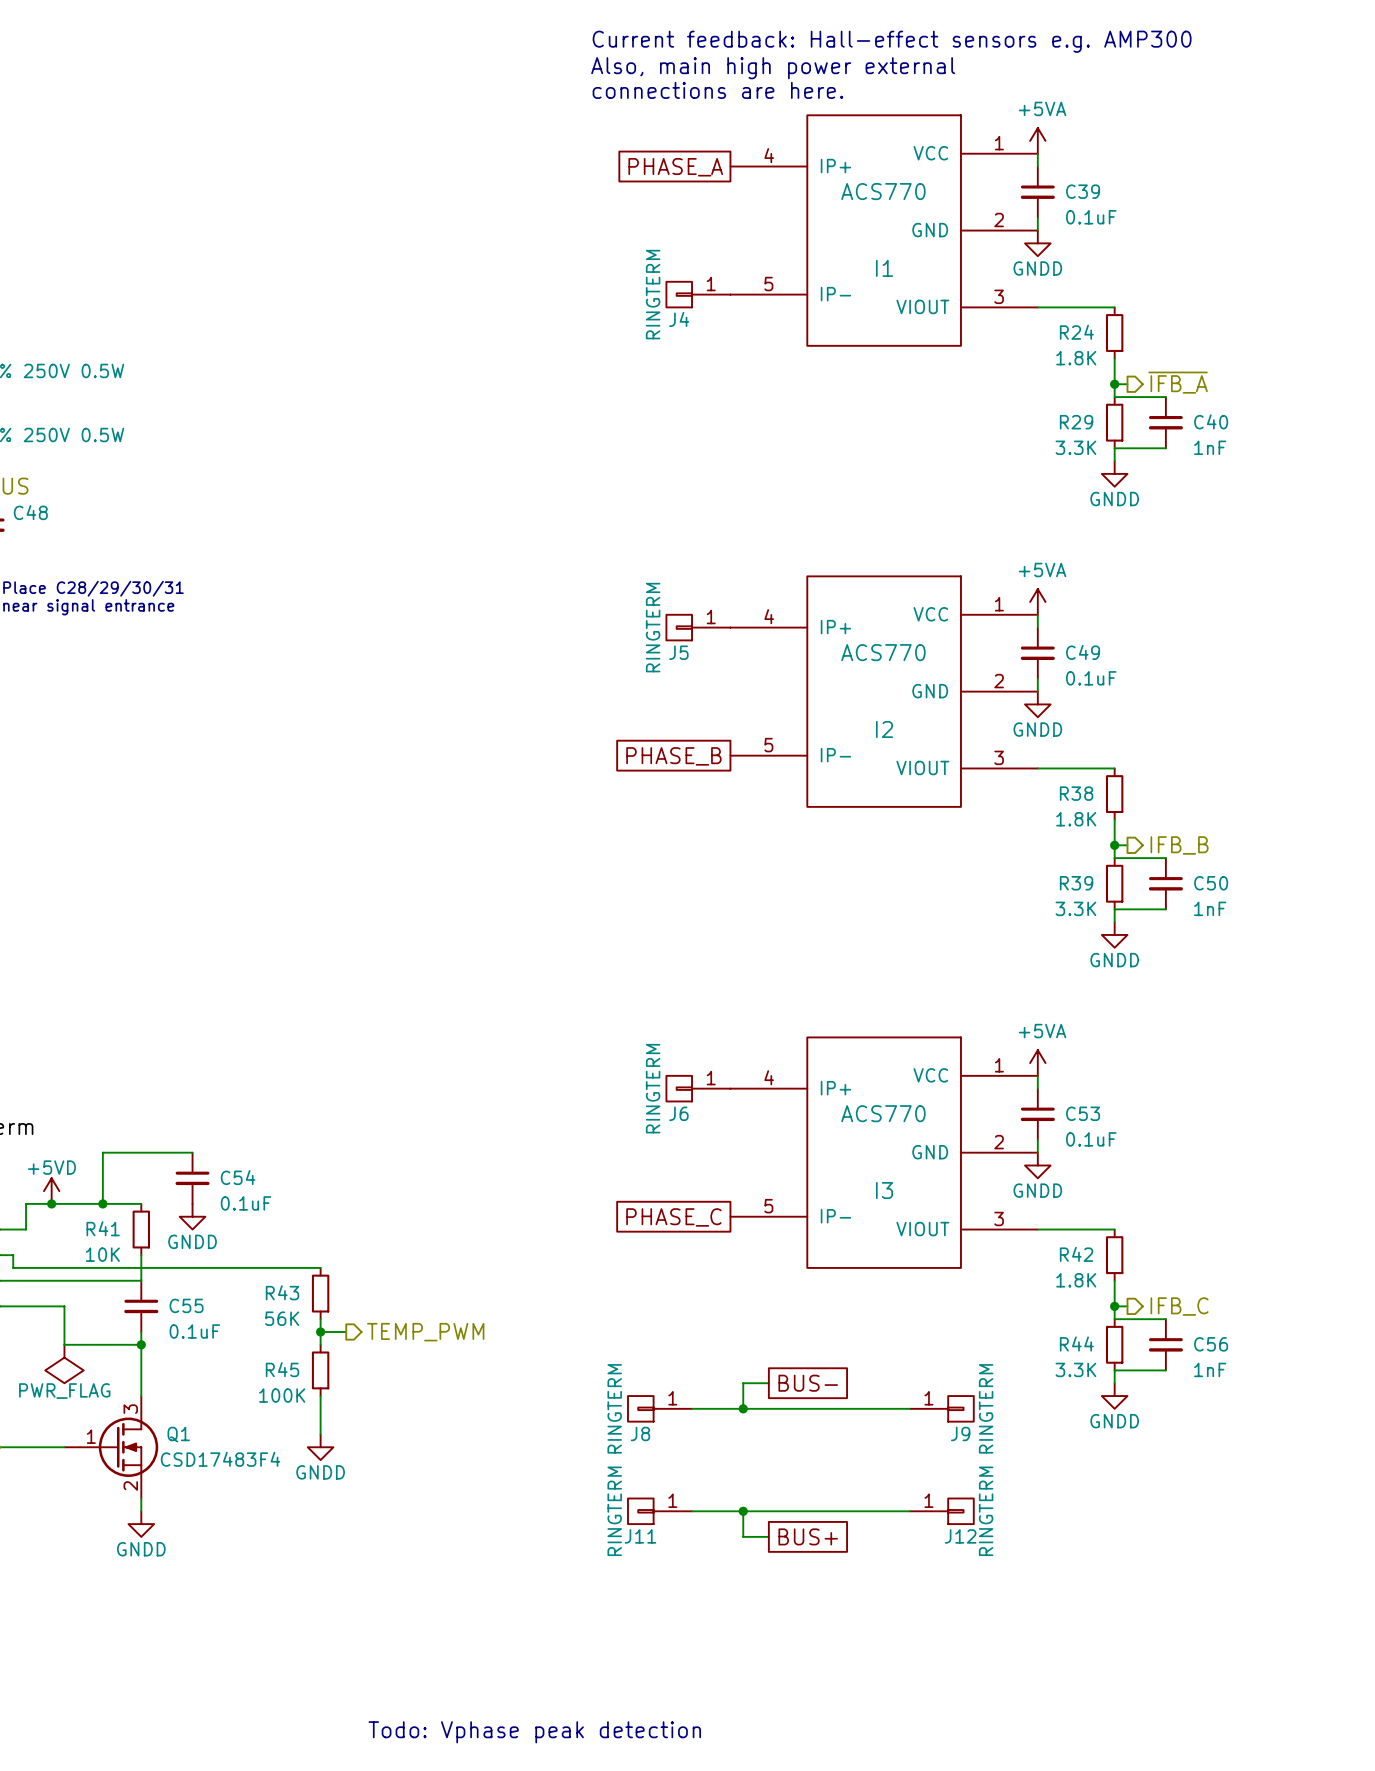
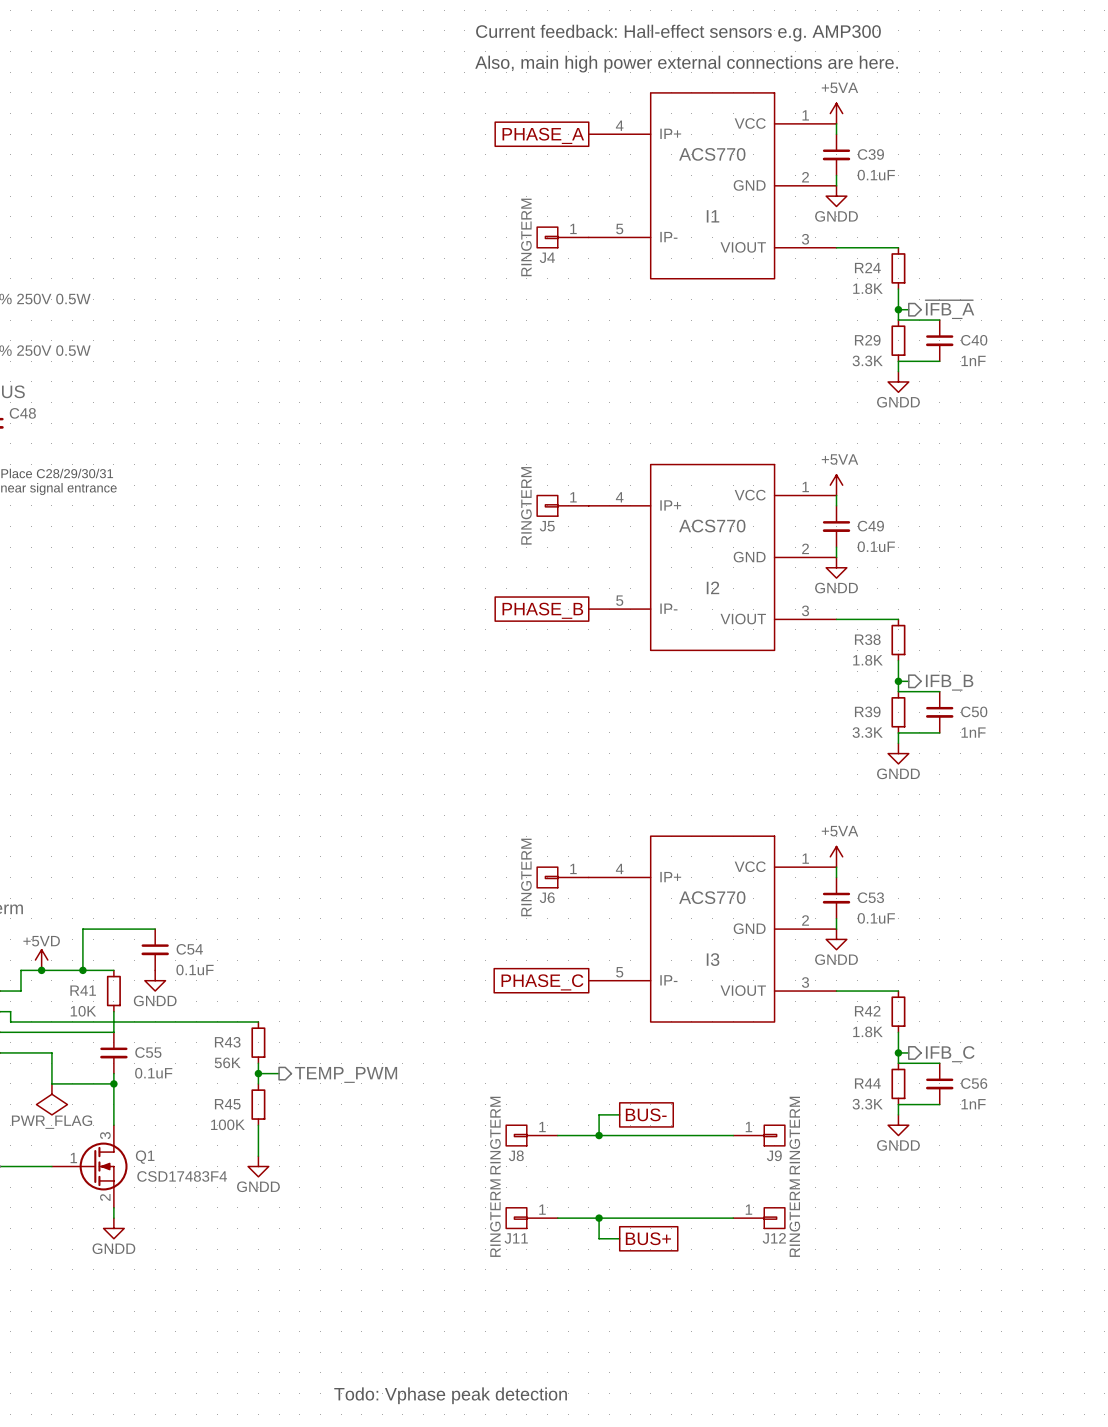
text: Also, main high power external (773, 68) -> Also, main high power external connections are here. (686, 64)
text: connections are here. (717, 90) -> none

